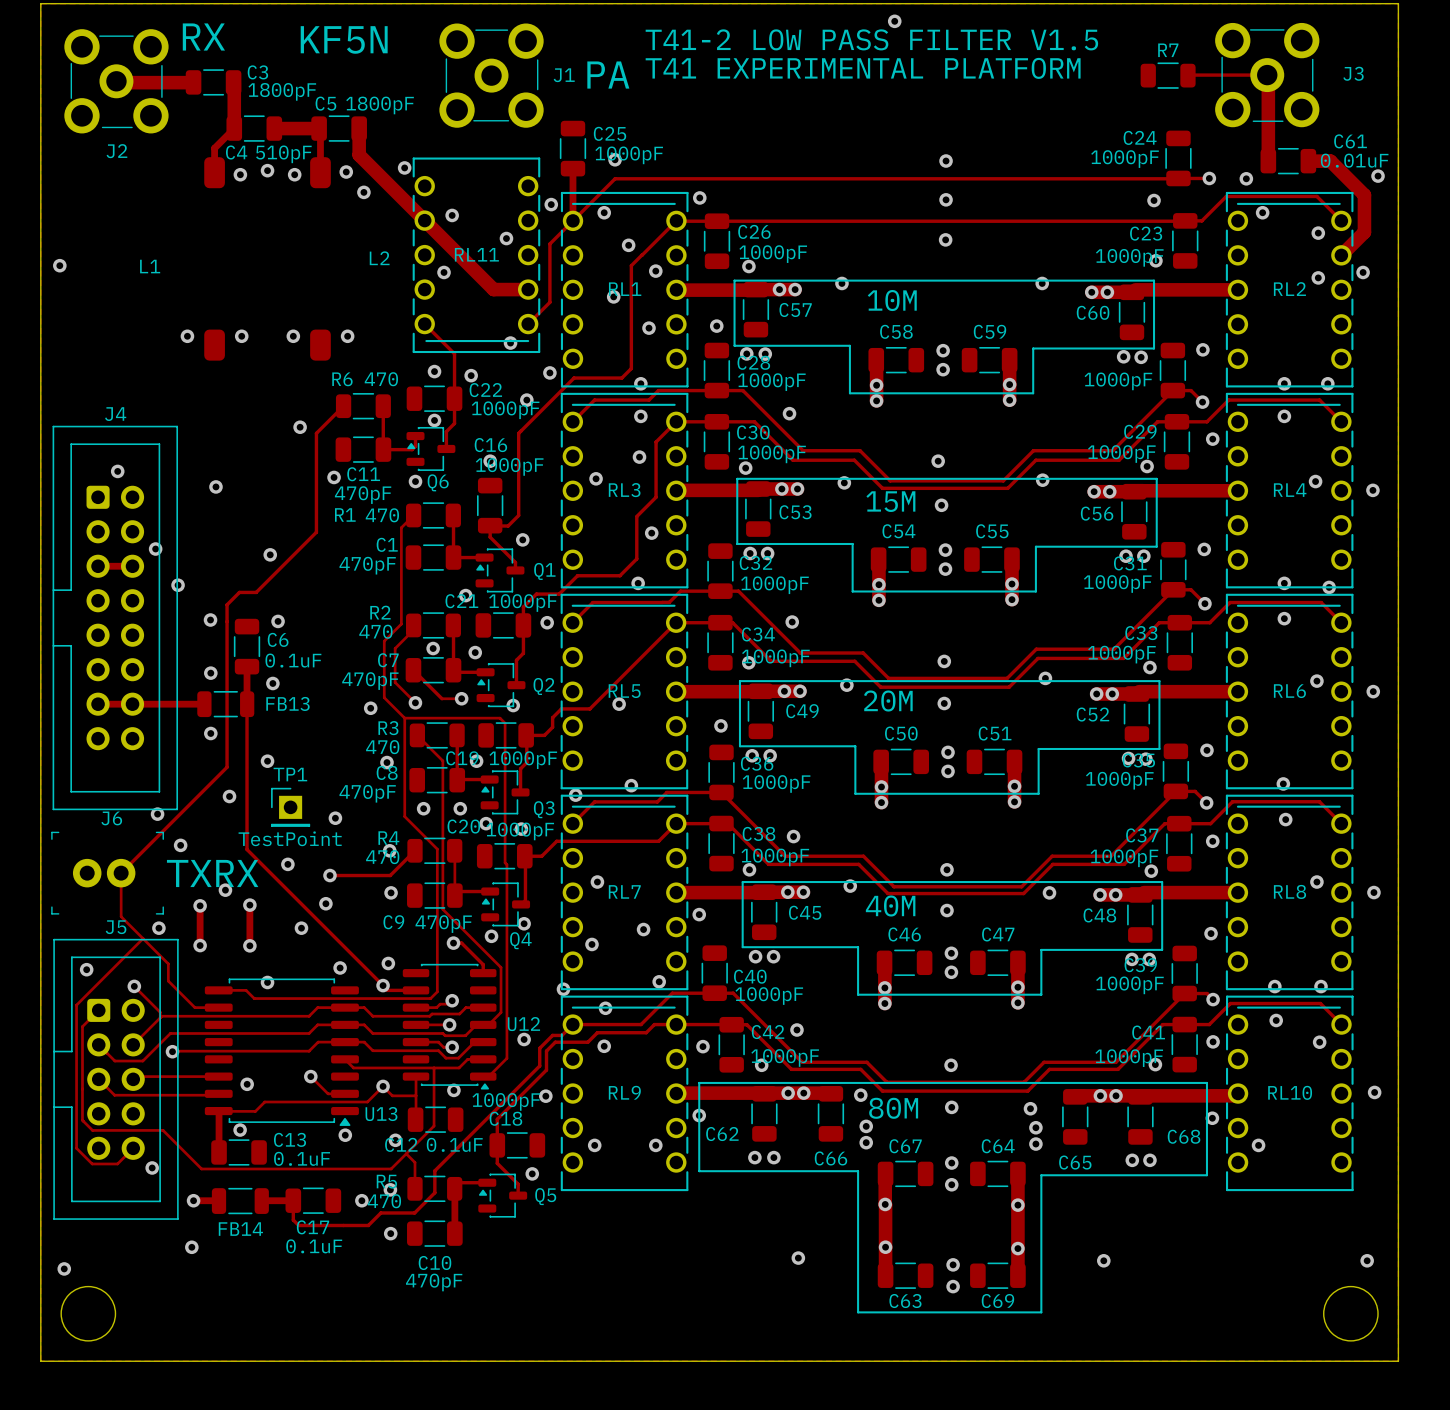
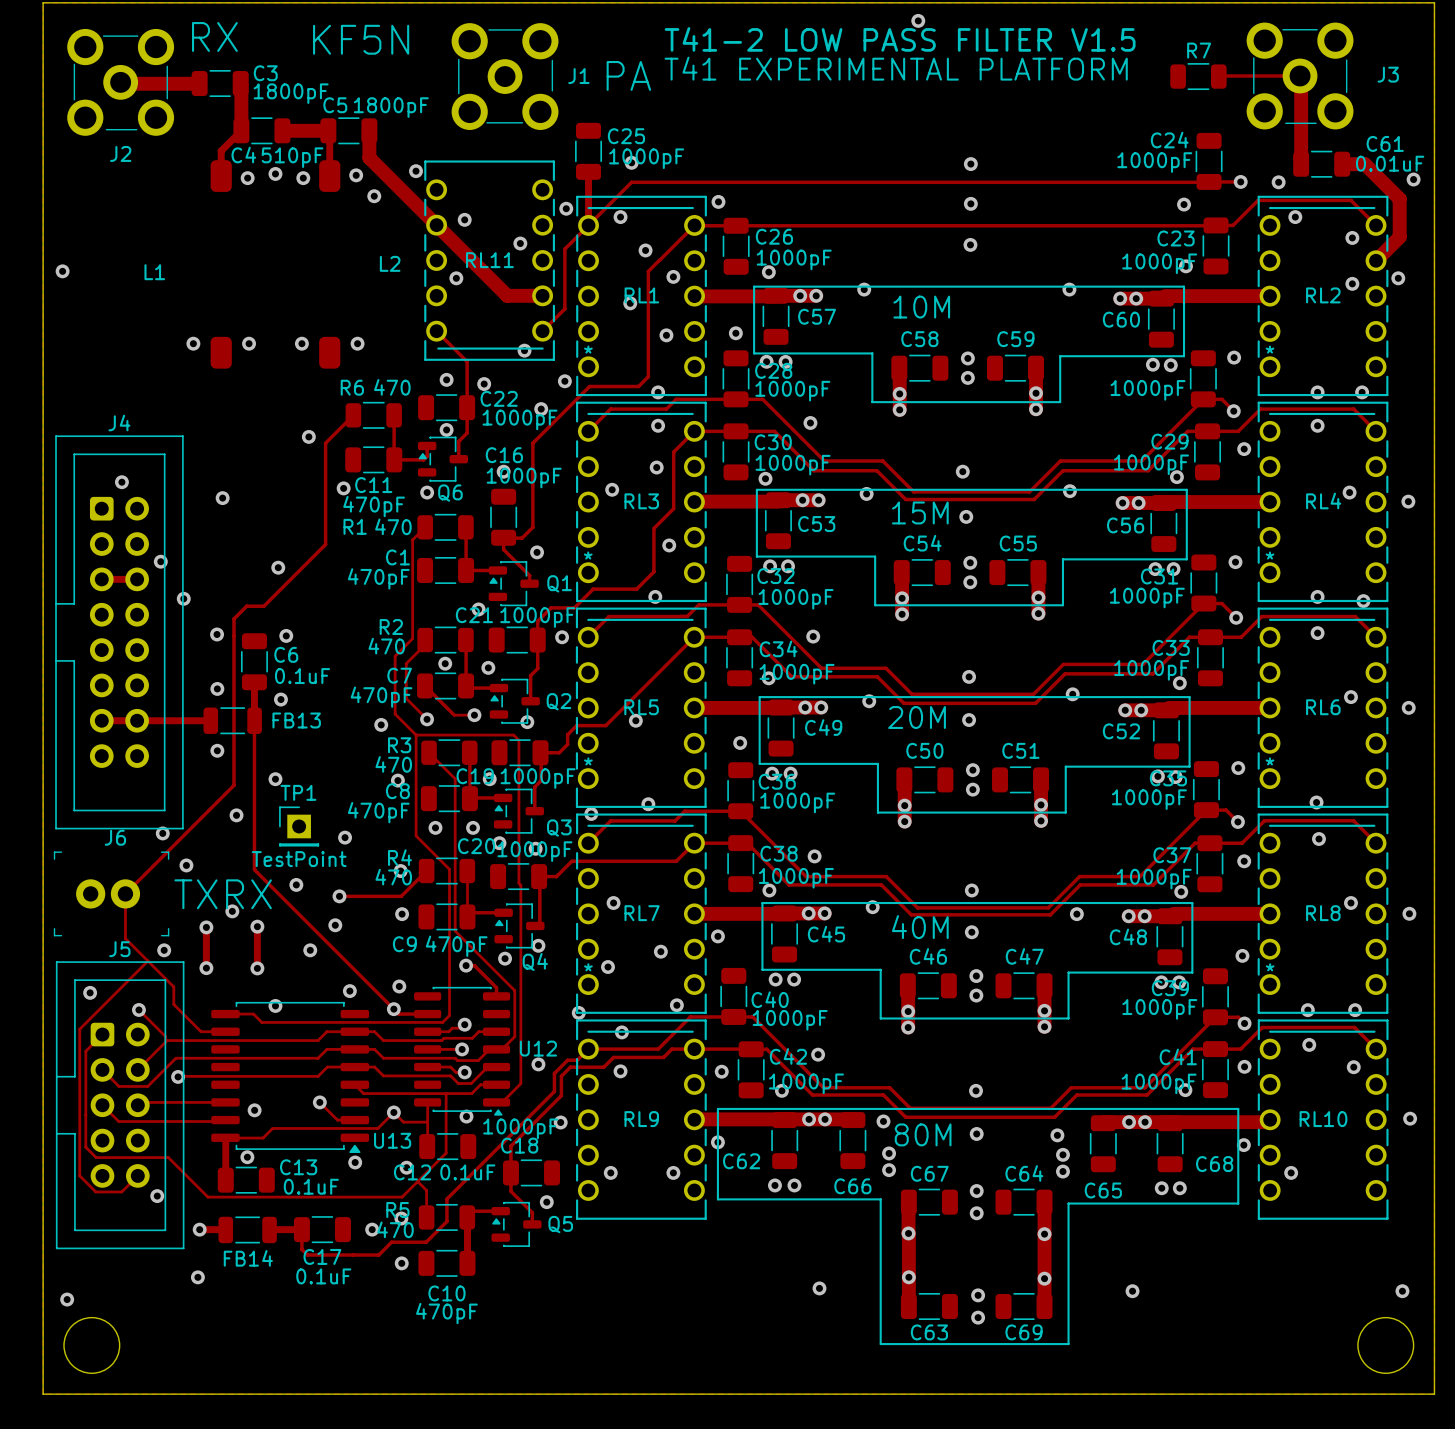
RL3 text: none -> * (588, 349)
RL4 text: none -> * (1270, 349)
RL5 text: none -> * (588, 555)
RL6 text: none -> * (1270, 555)
RL7 text: none -> * (588, 761)
RL8 text: none -> * (1270, 761)
RL9 text: none -> * (588, 967)
RL10 text: none -> * (1270, 967)

